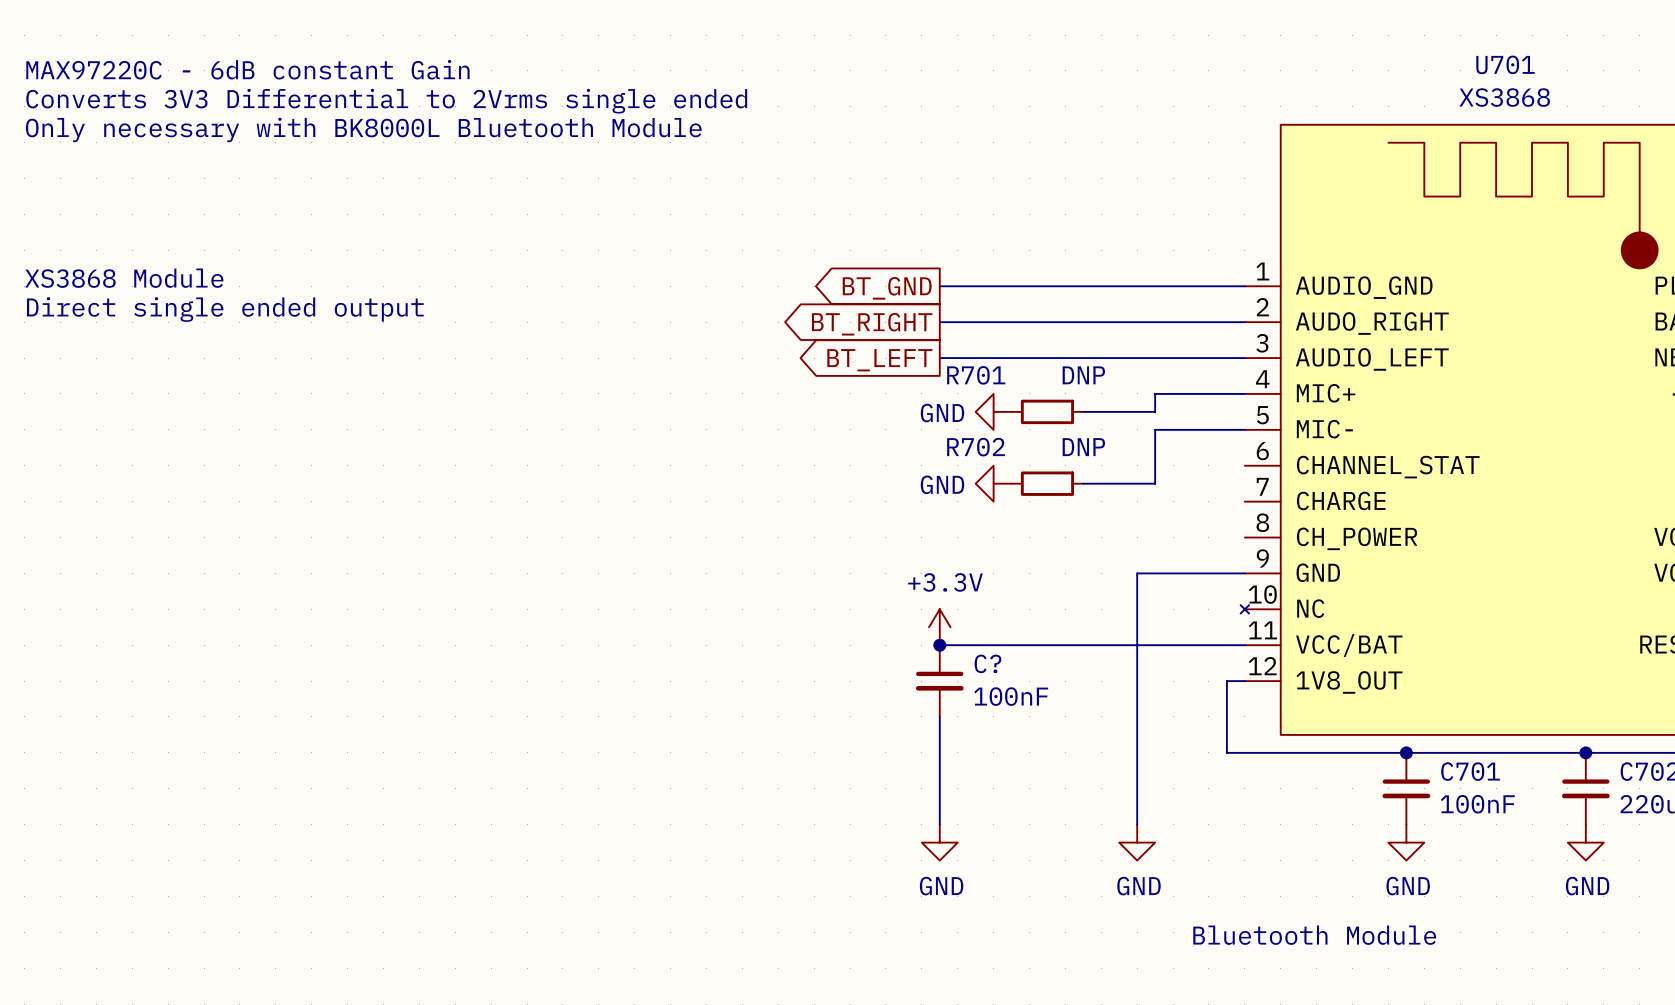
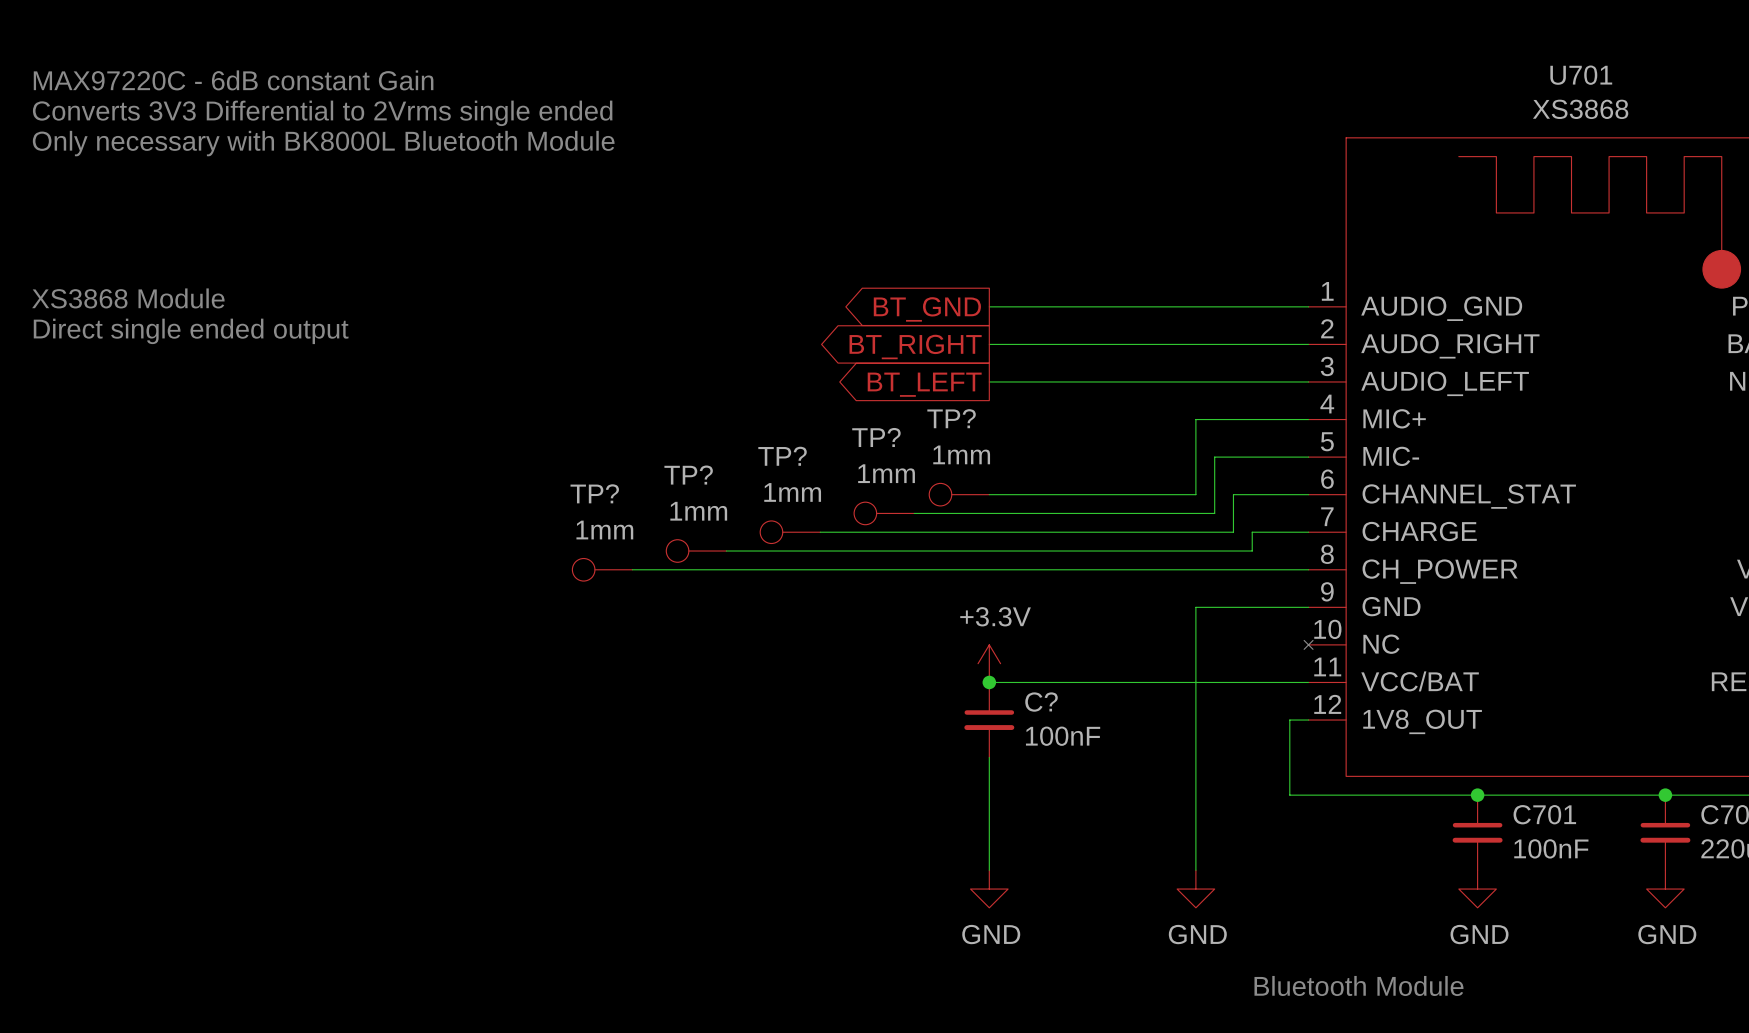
wire: (1155, 393) (1155, 411) (1083, 411) -> (1214, 419) (1195, 419) (1195, 494) (989, 494)
power symbol: GND (993, 411) -> none
R701: DNP (1047, 411) -> none
TP?: none -> 1mm (959, 494)
wire: none -> (1308, 494) (1233, 494) (1233, 532) (820, 532)
TP?: none -> 1mm (884, 513)
wire: none -> (914, 513) (1139, 513)
power symbol: GND (993, 483) -> none
R702: DNP (1047, 483) -> none
TP?: none -> 1mm (790, 532)
wire: none -> (1308, 532) (1252, 532) (1252, 551) (726, 551)
TP?: none -> 1mm (696, 551)
TP?: none -> 1mm (602, 569)
wire: none -> (632, 569) (1308, 569)

